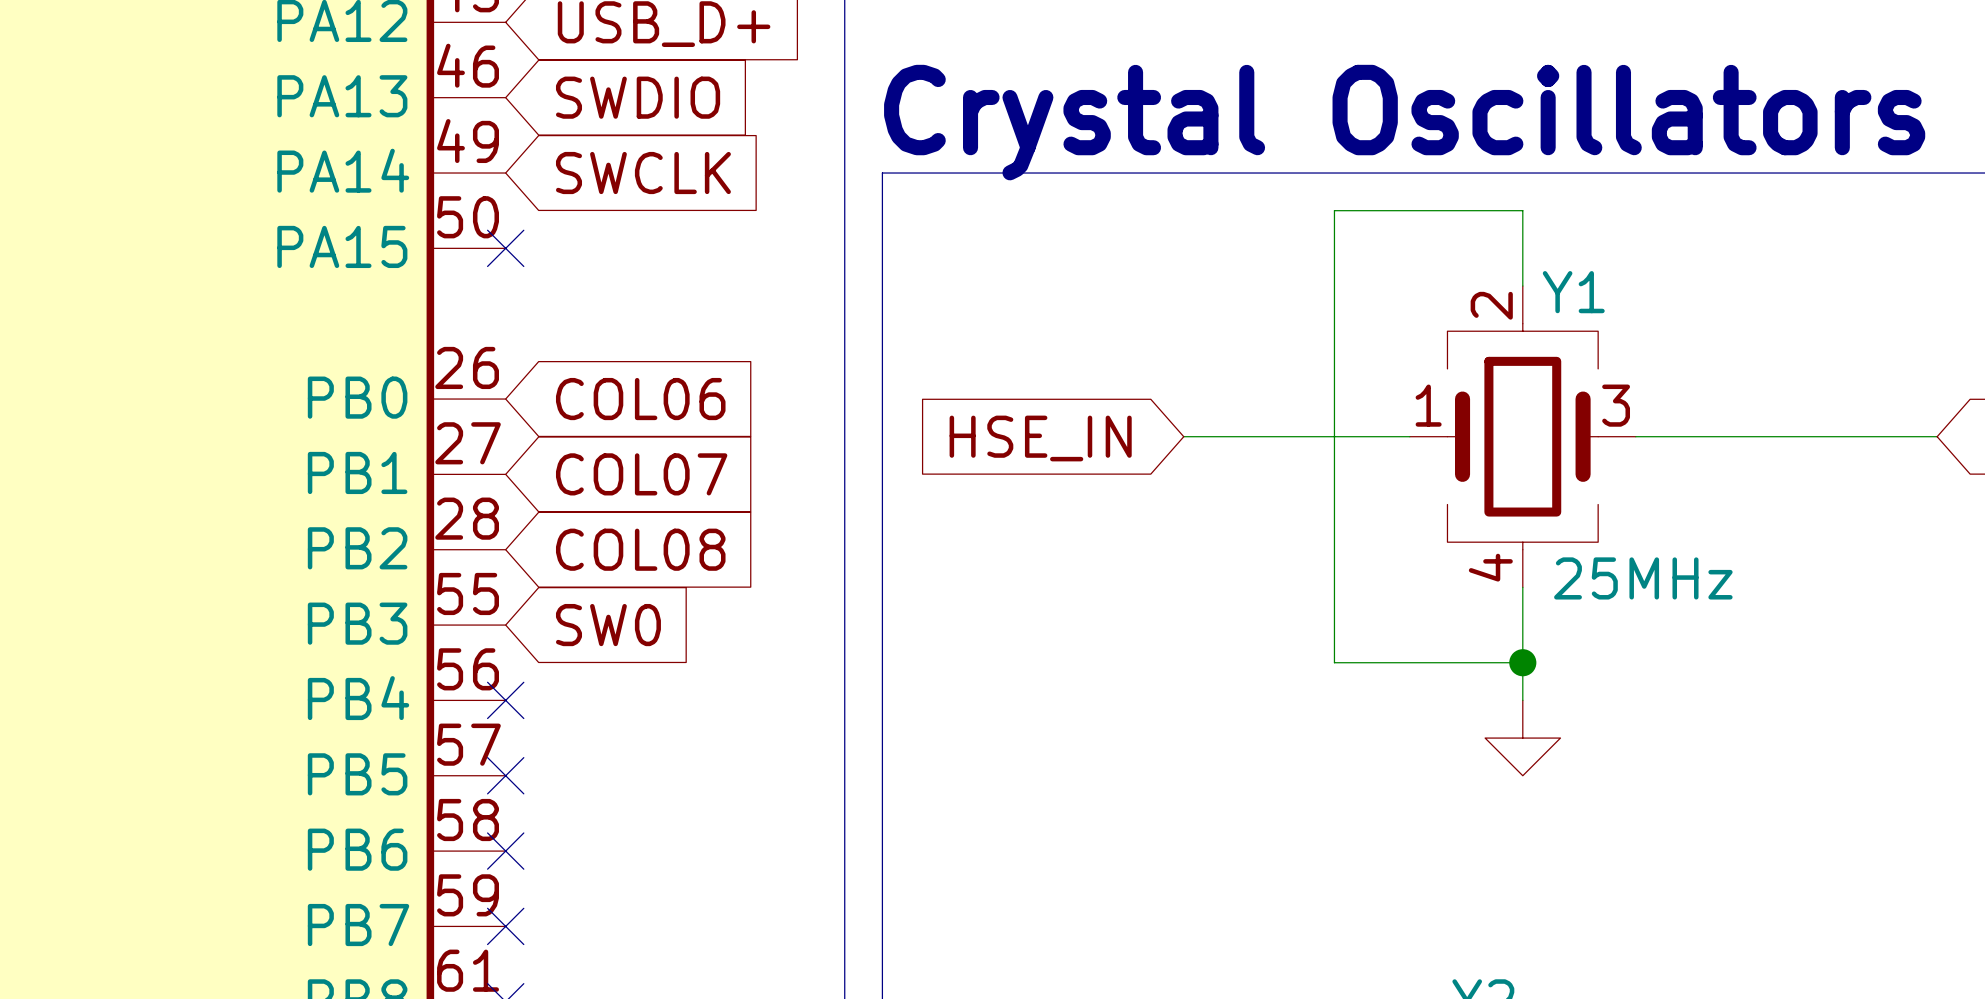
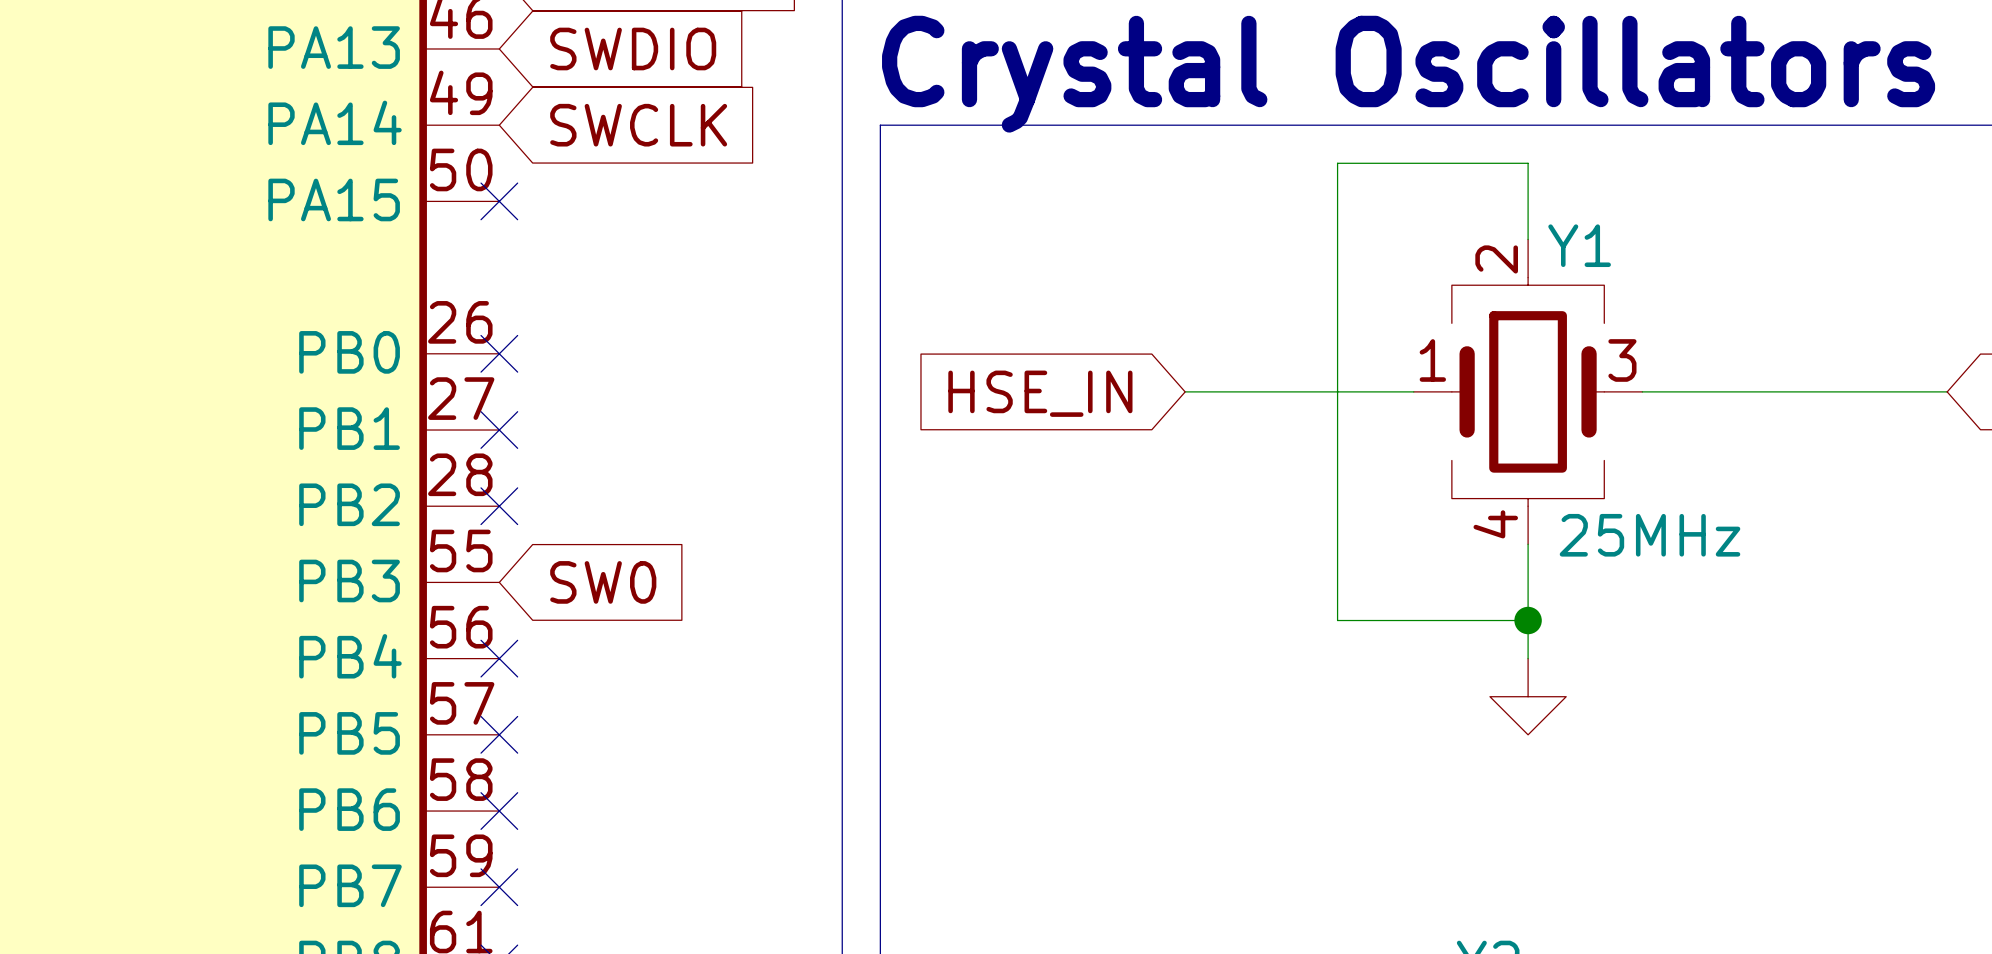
no-connect mark: none -> (499, 353)
global label: COL06 (640, 399) -> none
no-connect mark: none -> (499, 430)
global label: COL07 (641, 474) -> none
no-connect mark: none -> (499, 506)
global label: COL08 (640, 549) -> none

